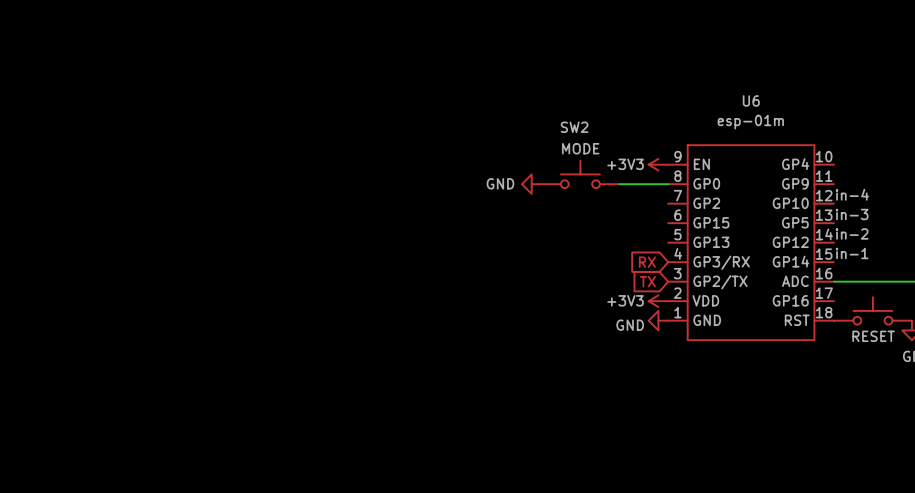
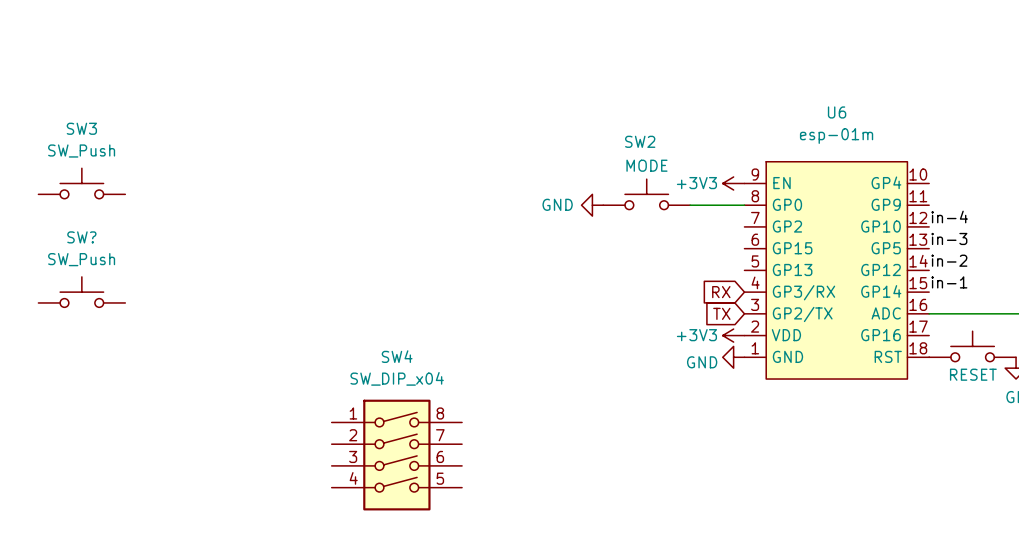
SW3: none -> SW_Push (81, 183)
SW?: none -> SW_Push (81, 292)
SW4: none -> SW_DIP_x04 (396, 455)

